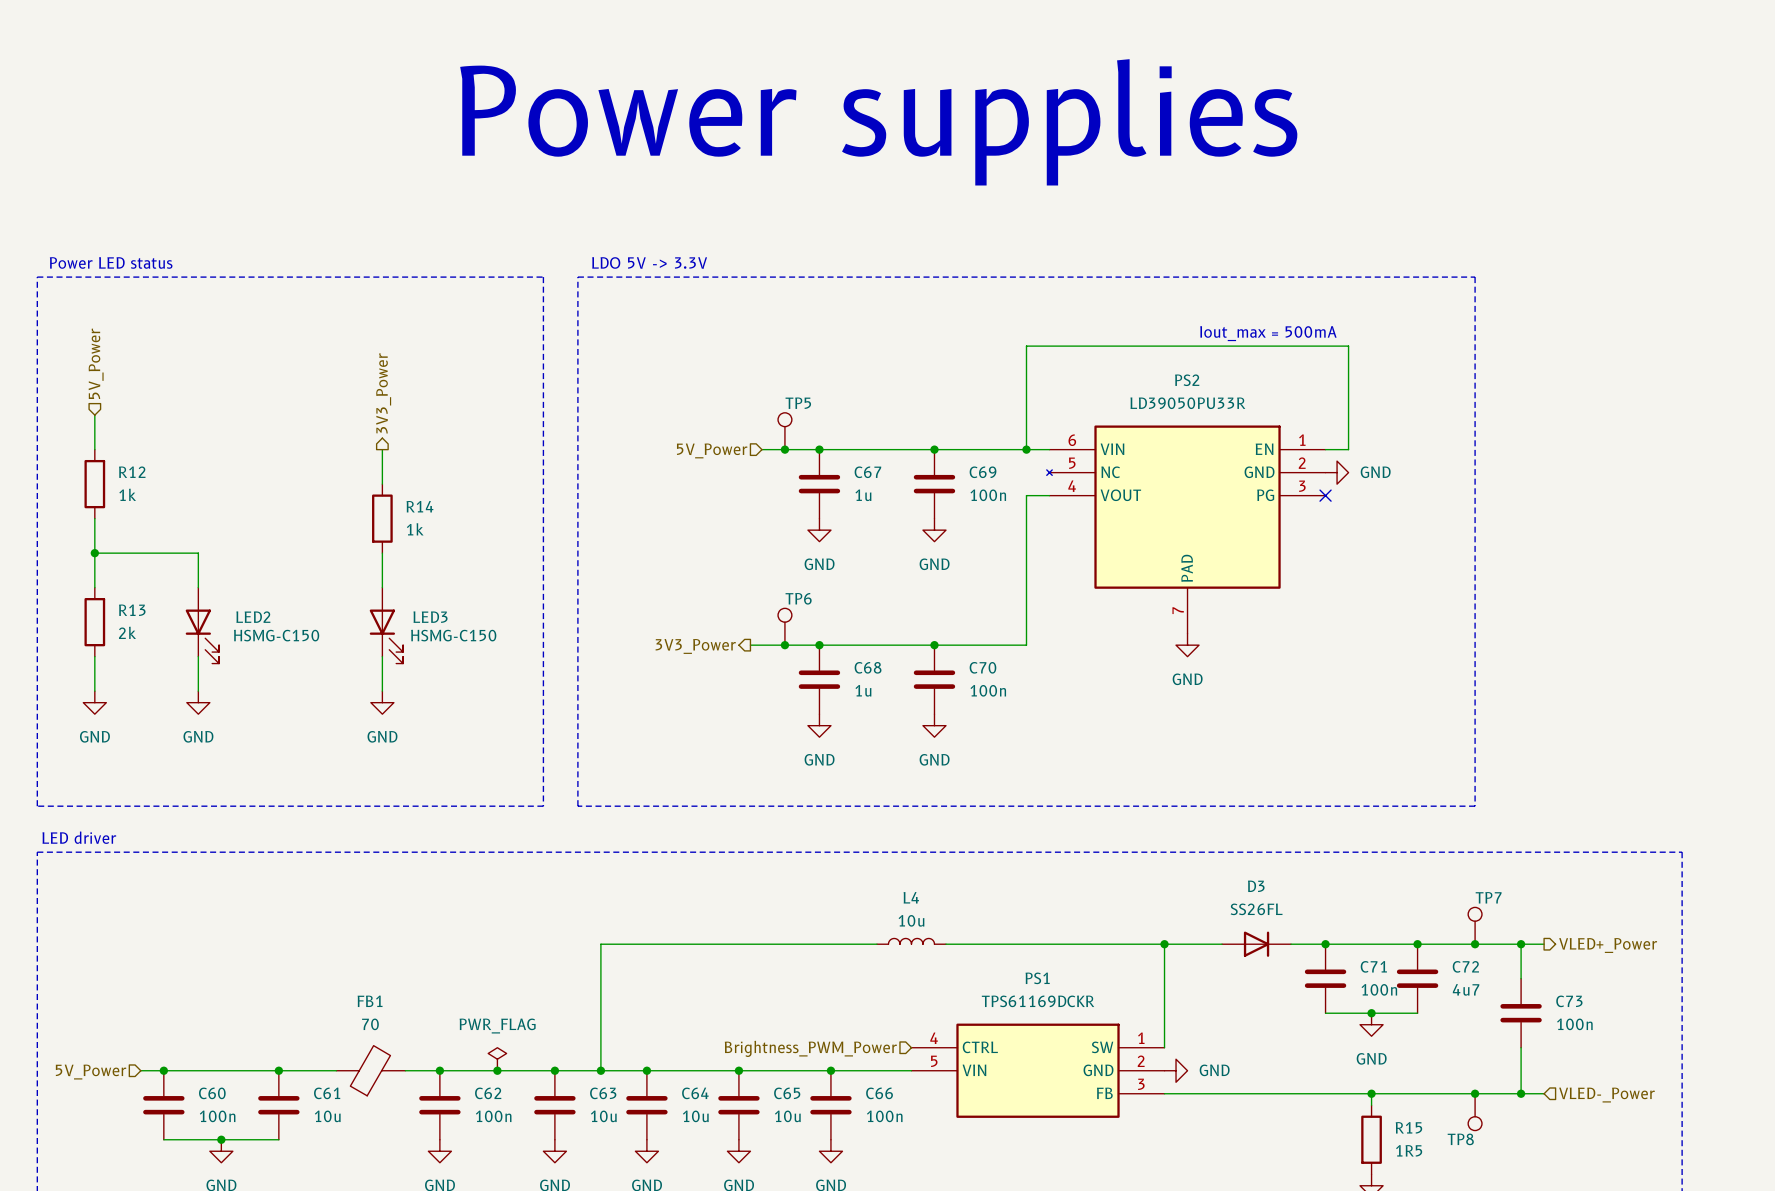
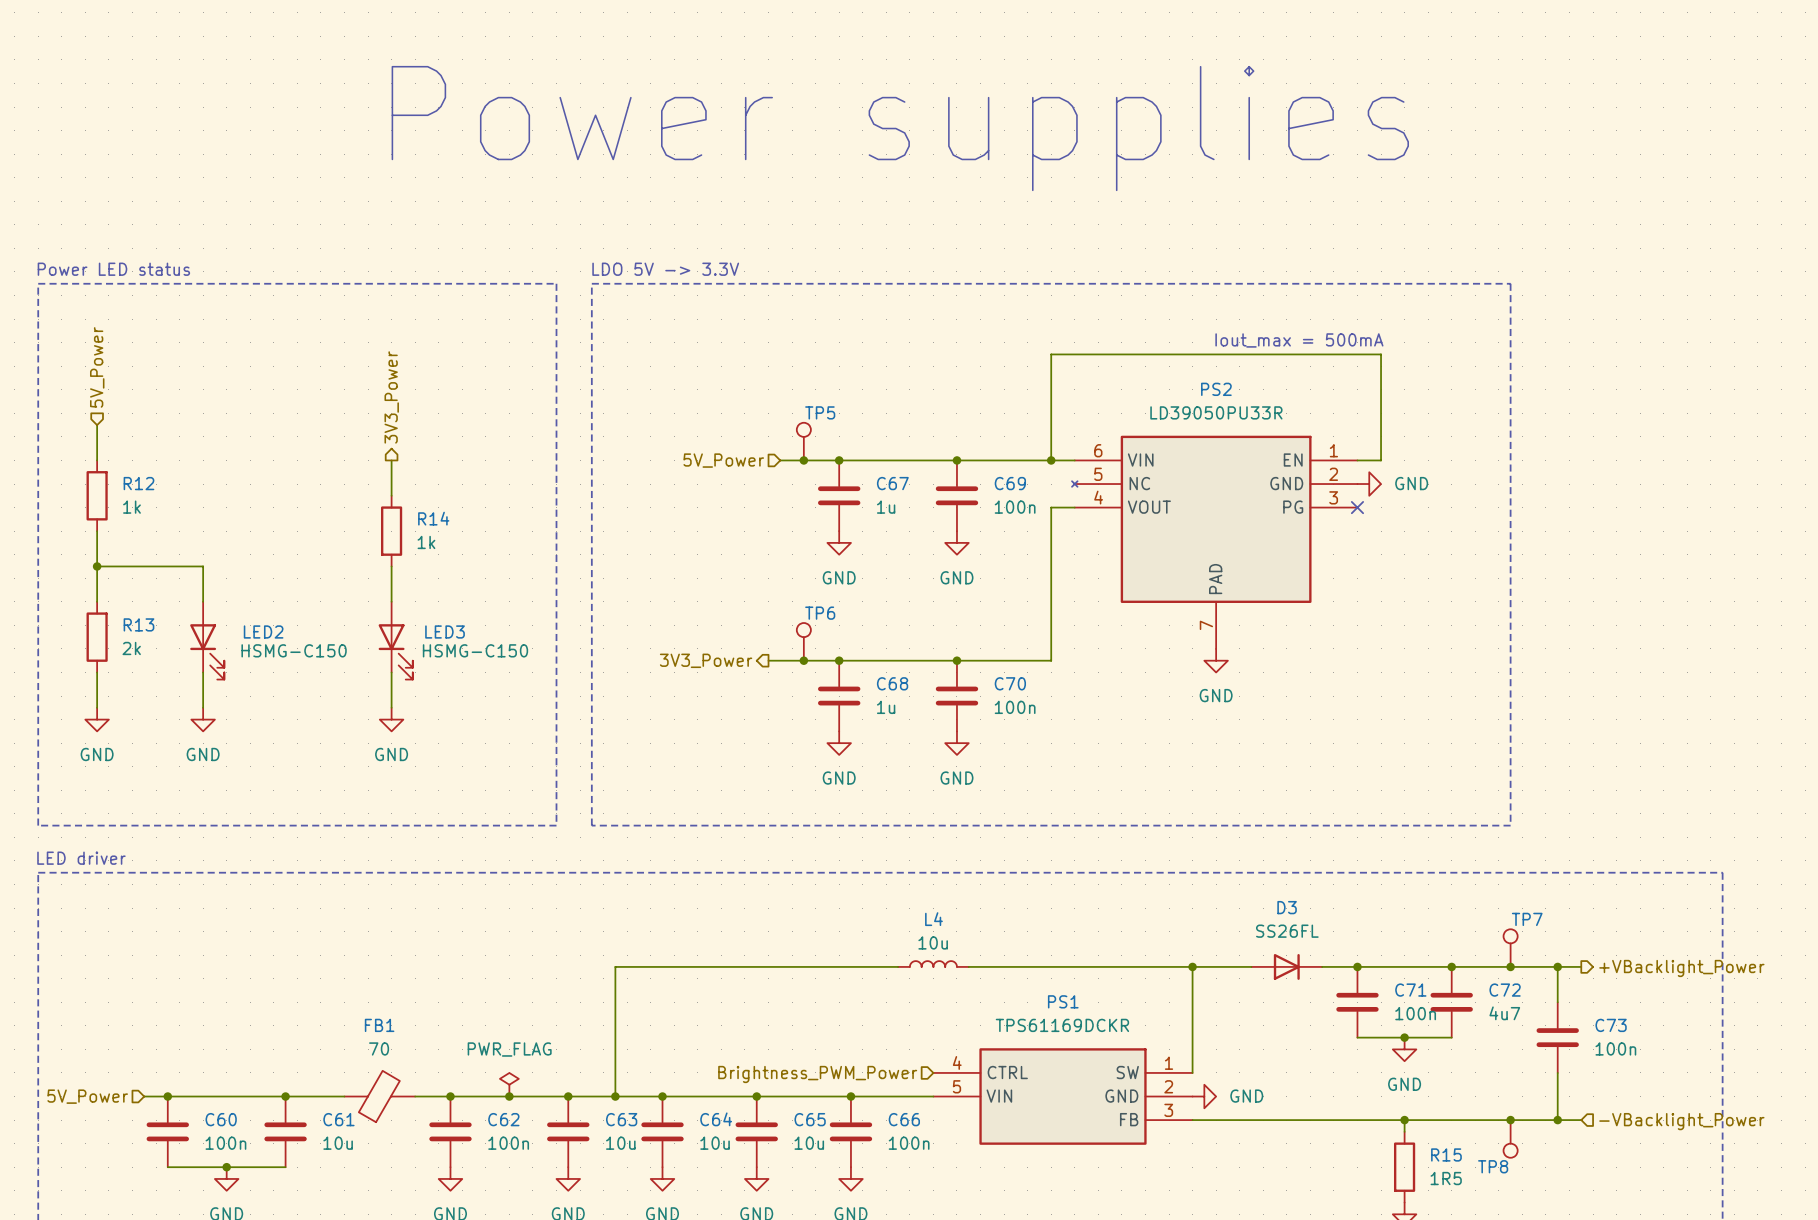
hierarchical label: VLED+_Power (1608, 945) -> +VBacklight_Power (1681, 968)
hierarchical label: VLED-_Power (1607, 1095) -> -VBacklight_Power (1681, 1121)

